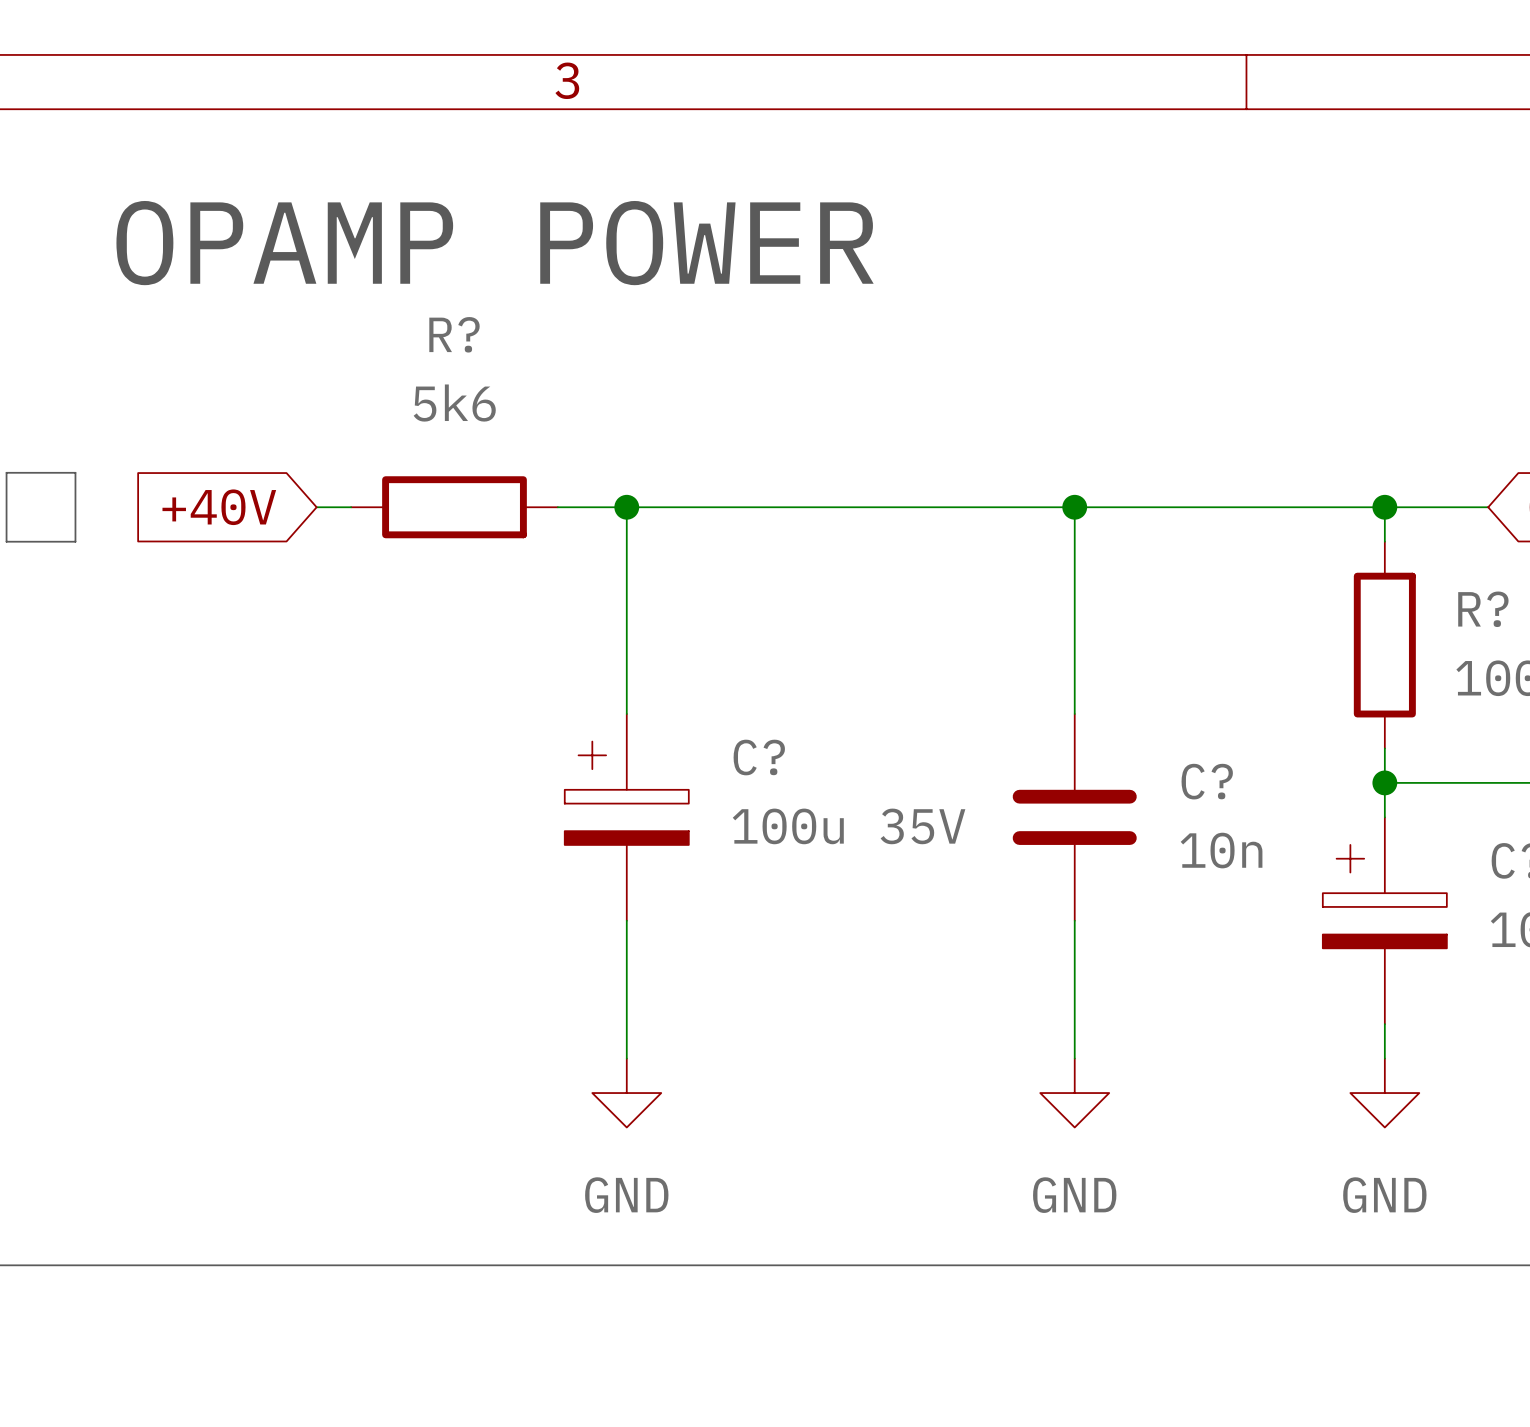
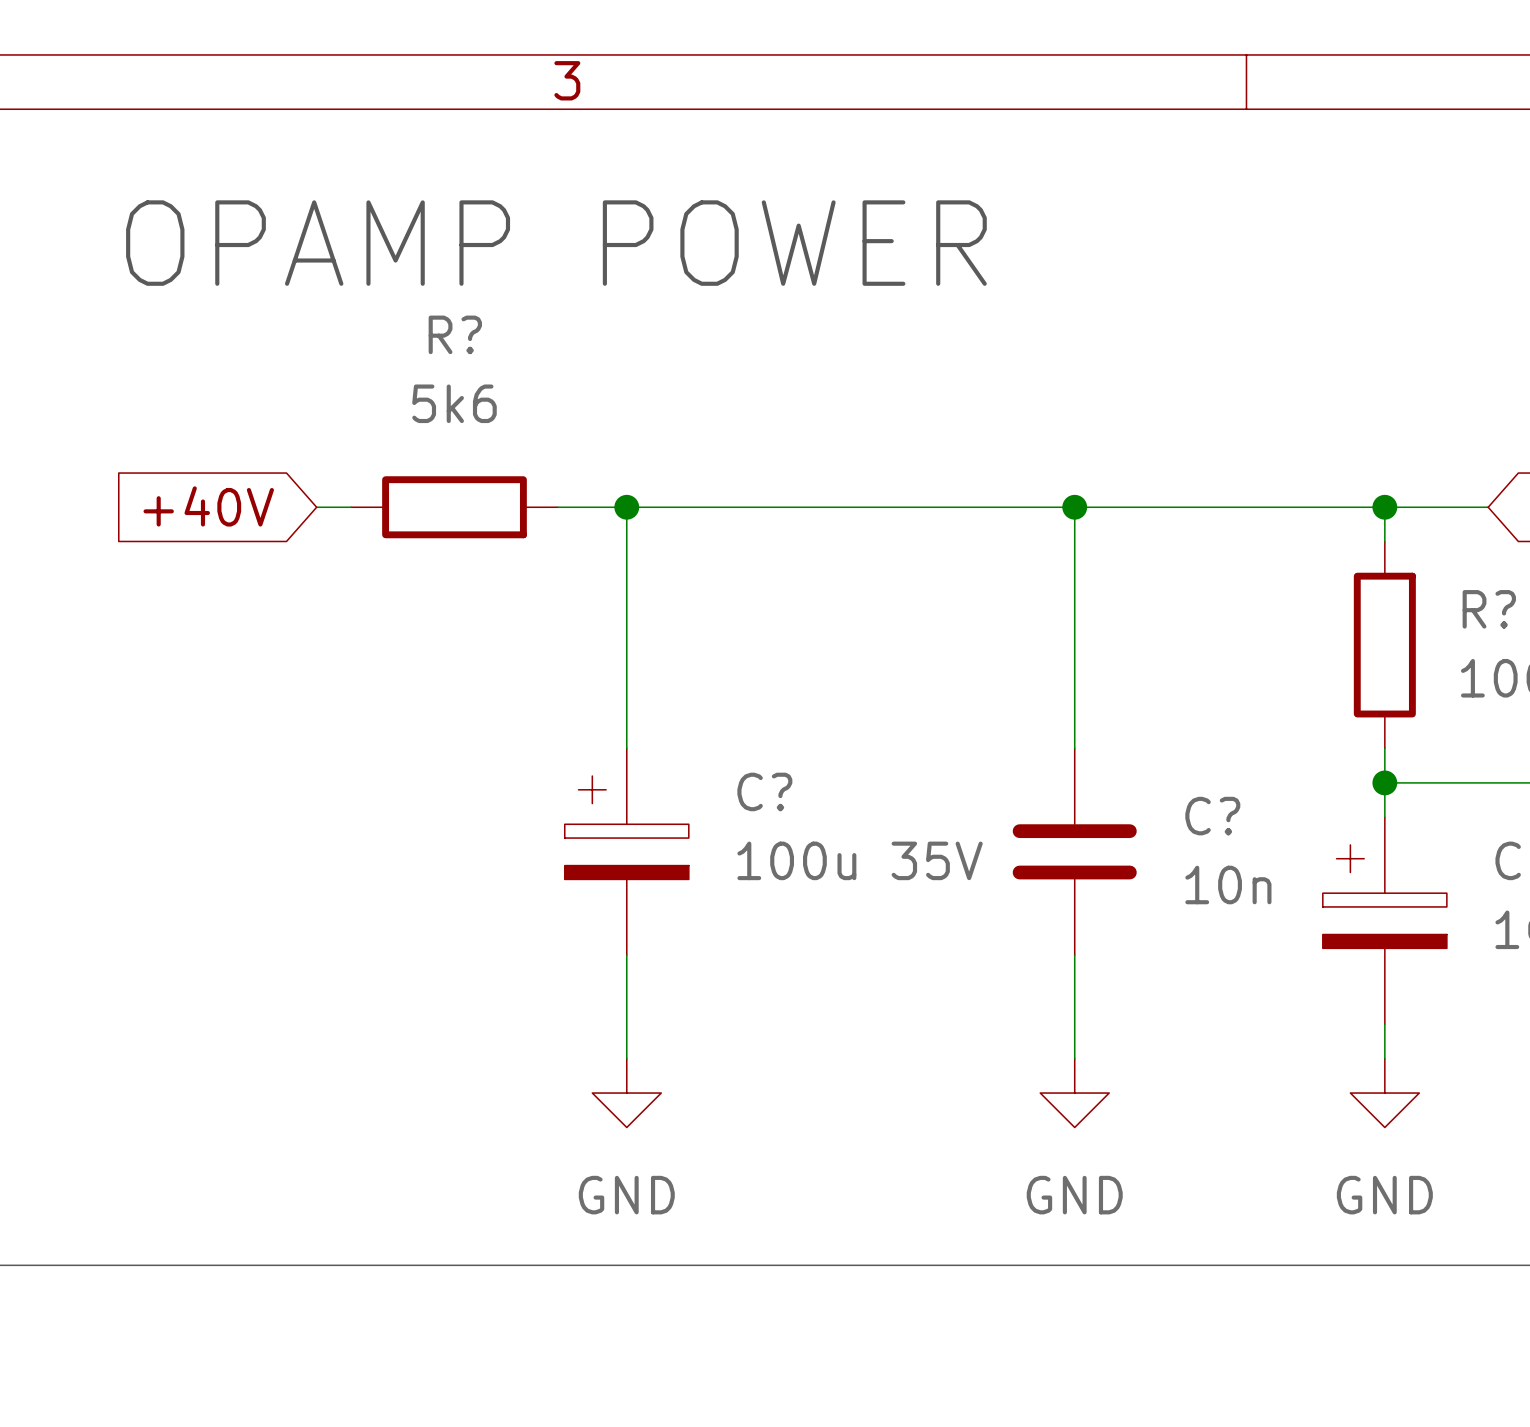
line: (6, 472) (75, 472) (75, 541) (6, 541) (6, 472) -> none
C? position: (626, 817) -> (626, 851)
C? position: (1074, 817) -> (1074, 851)

